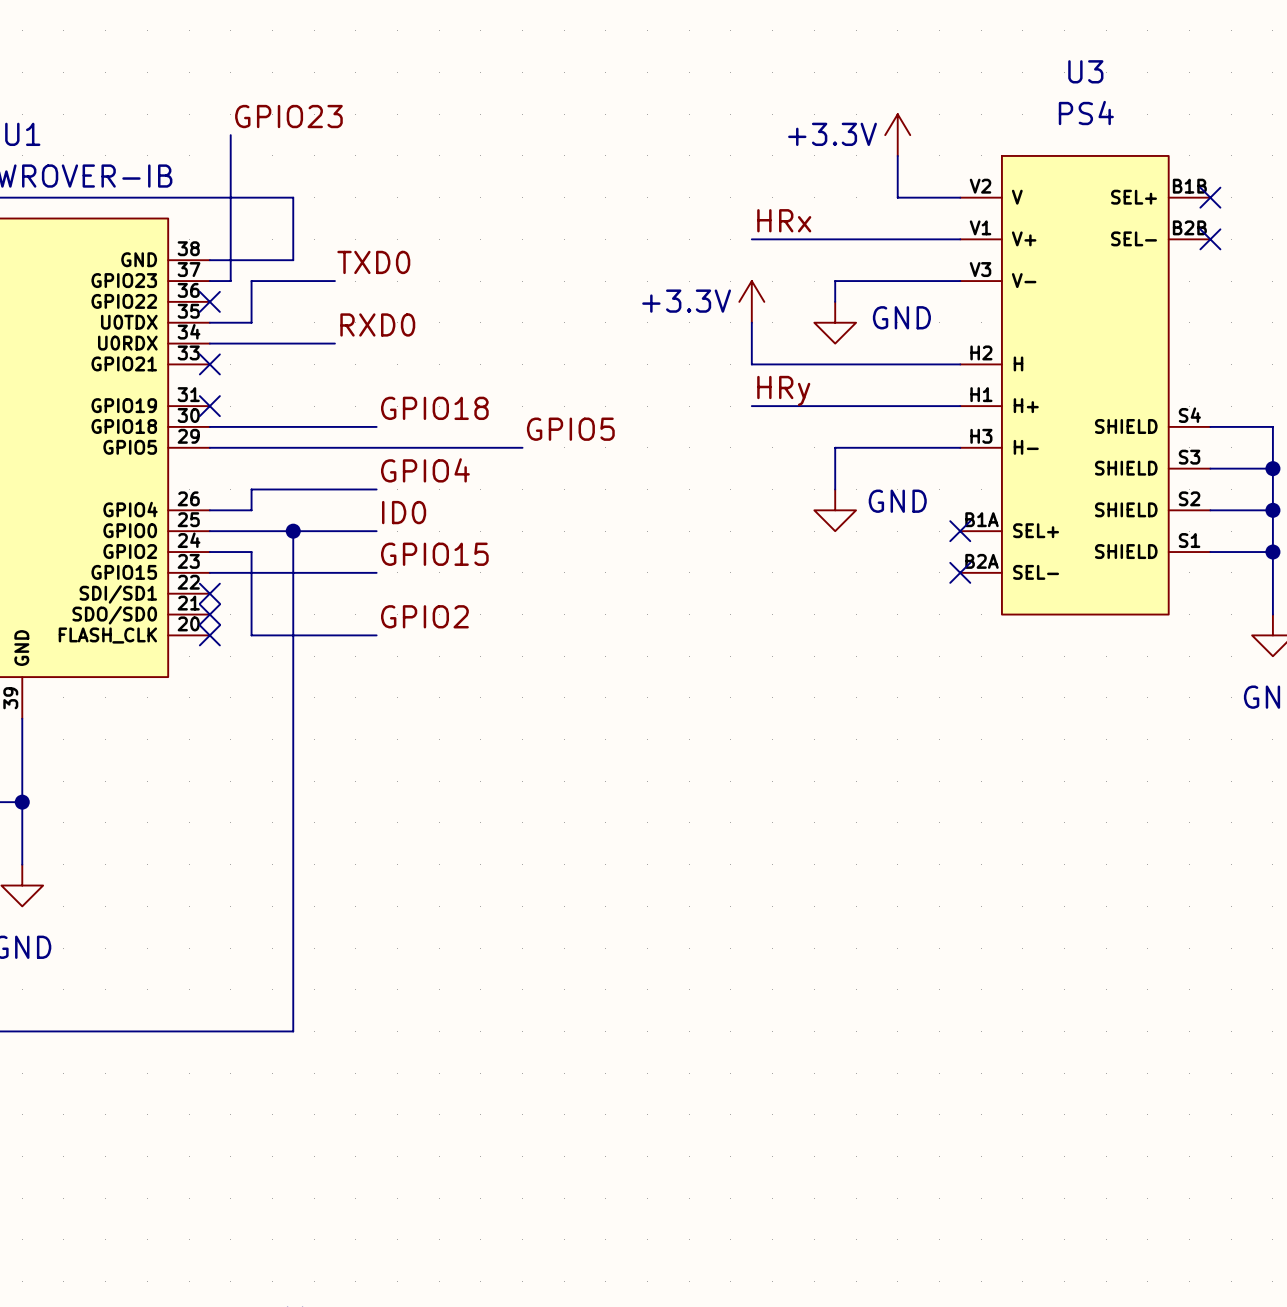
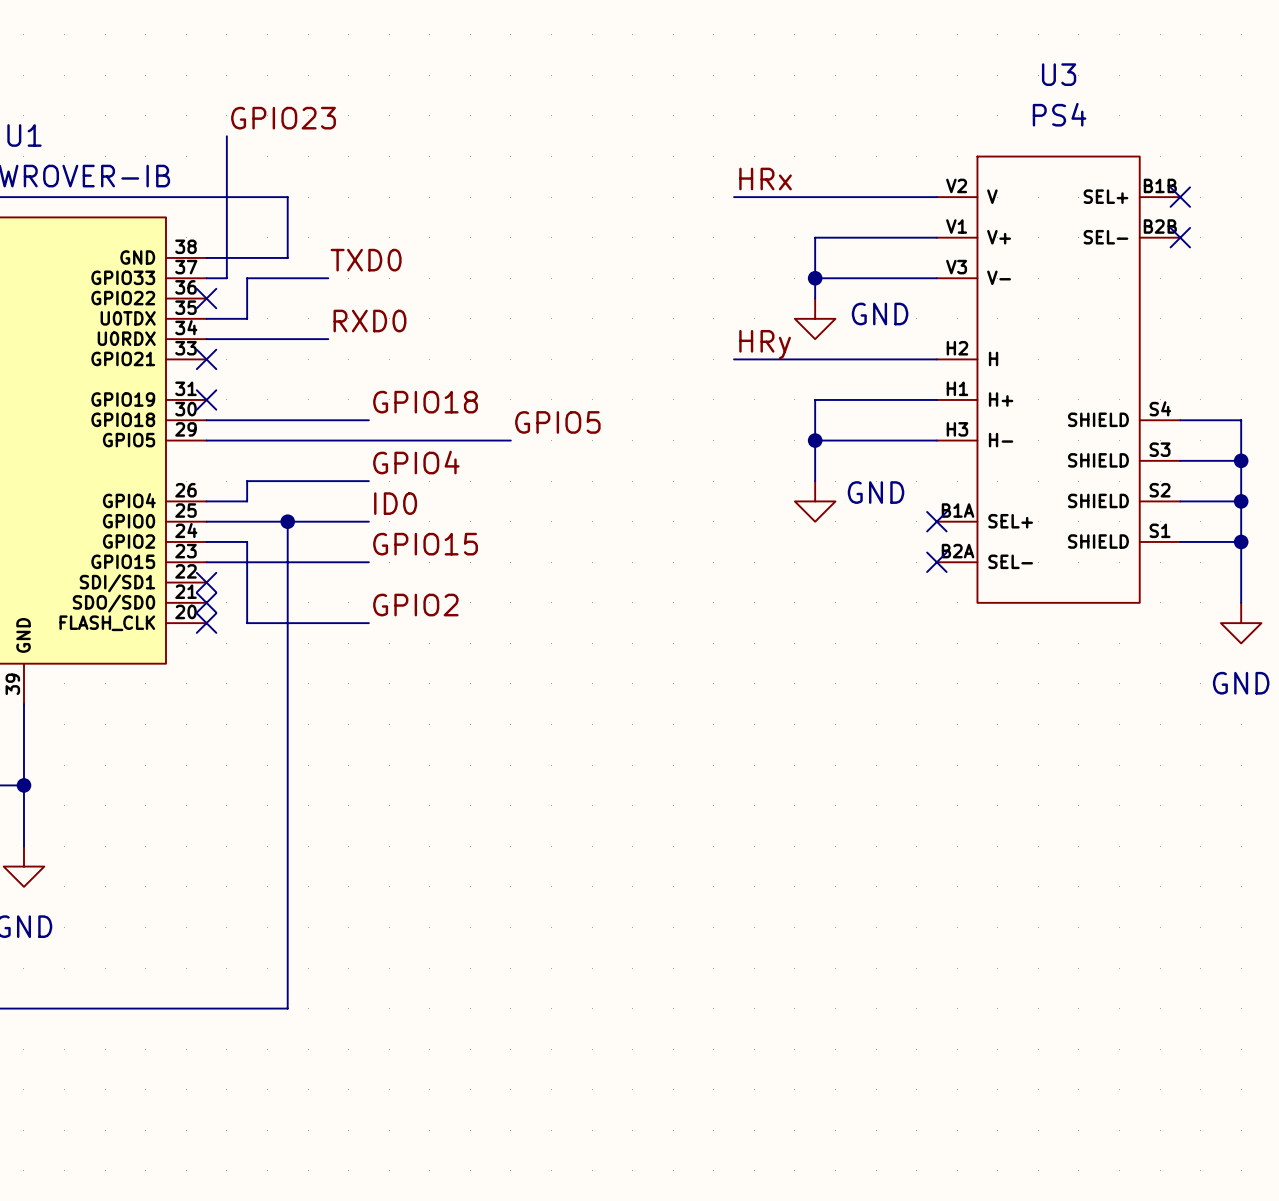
power symbol: +3.3V (897, 135) -> none
wire: (897, 155) (897, 197) -> (734, 197) (876, 197)
U3 symbol: [960, 155, 1211, 615] -> [936, 156, 1181, 603]
label position: HRx (784, 220) -> HRx (765, 179)
wire: (751, 239) (835, 239) -> (815, 278) (815, 237)
U1 pin name: GPIO23 (124, 280) -> GPIO33 (123, 277)
junction: none -> (815, 278)
power symbol: +3.3V (751, 301) -> none
wire: (751, 322) (751, 364) -> none
label position: HRy (783, 390) -> HRy (765, 344)
wire: (751, 406) (835, 406) -> (815, 440) (815, 399)
junction: none -> (815, 440)

